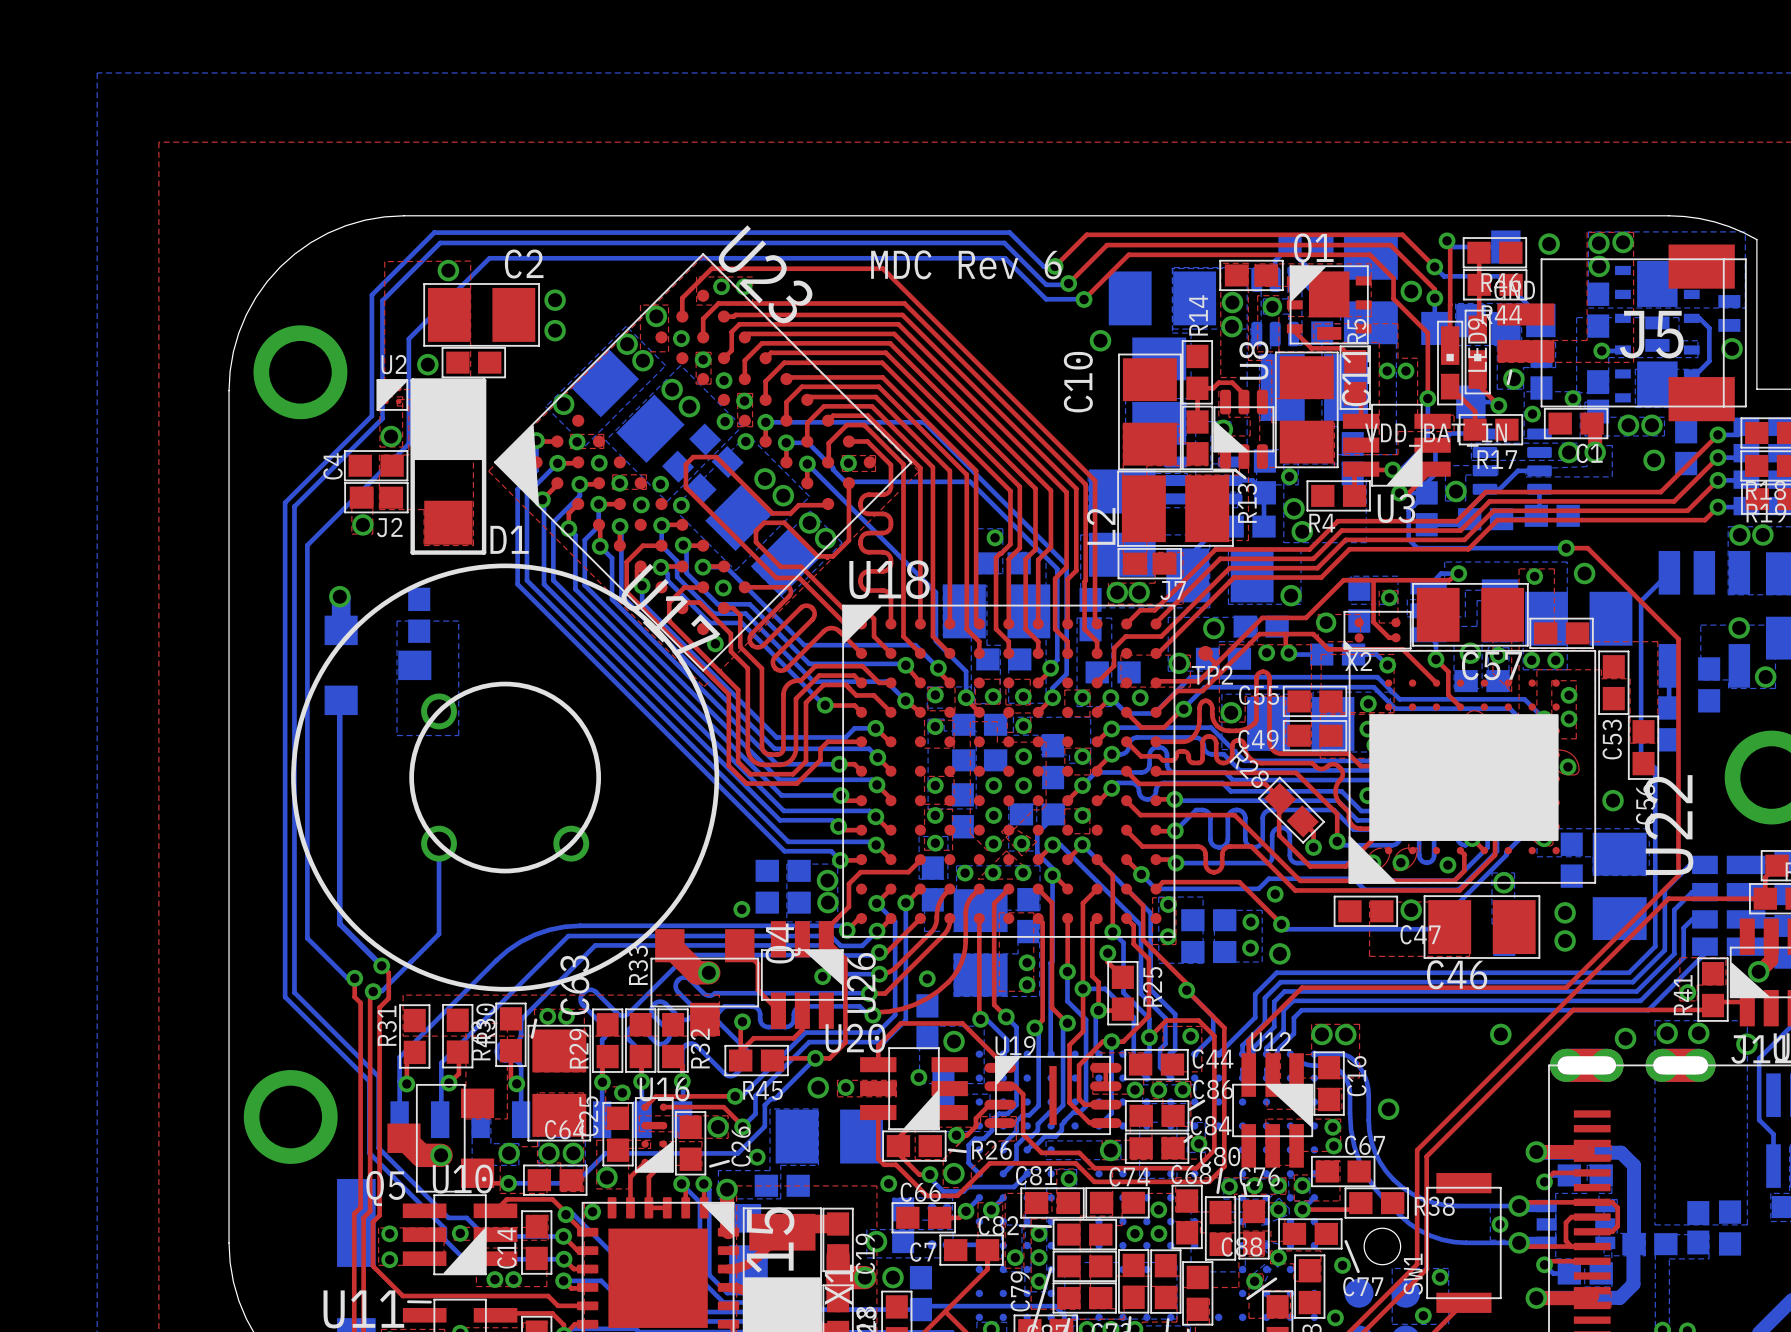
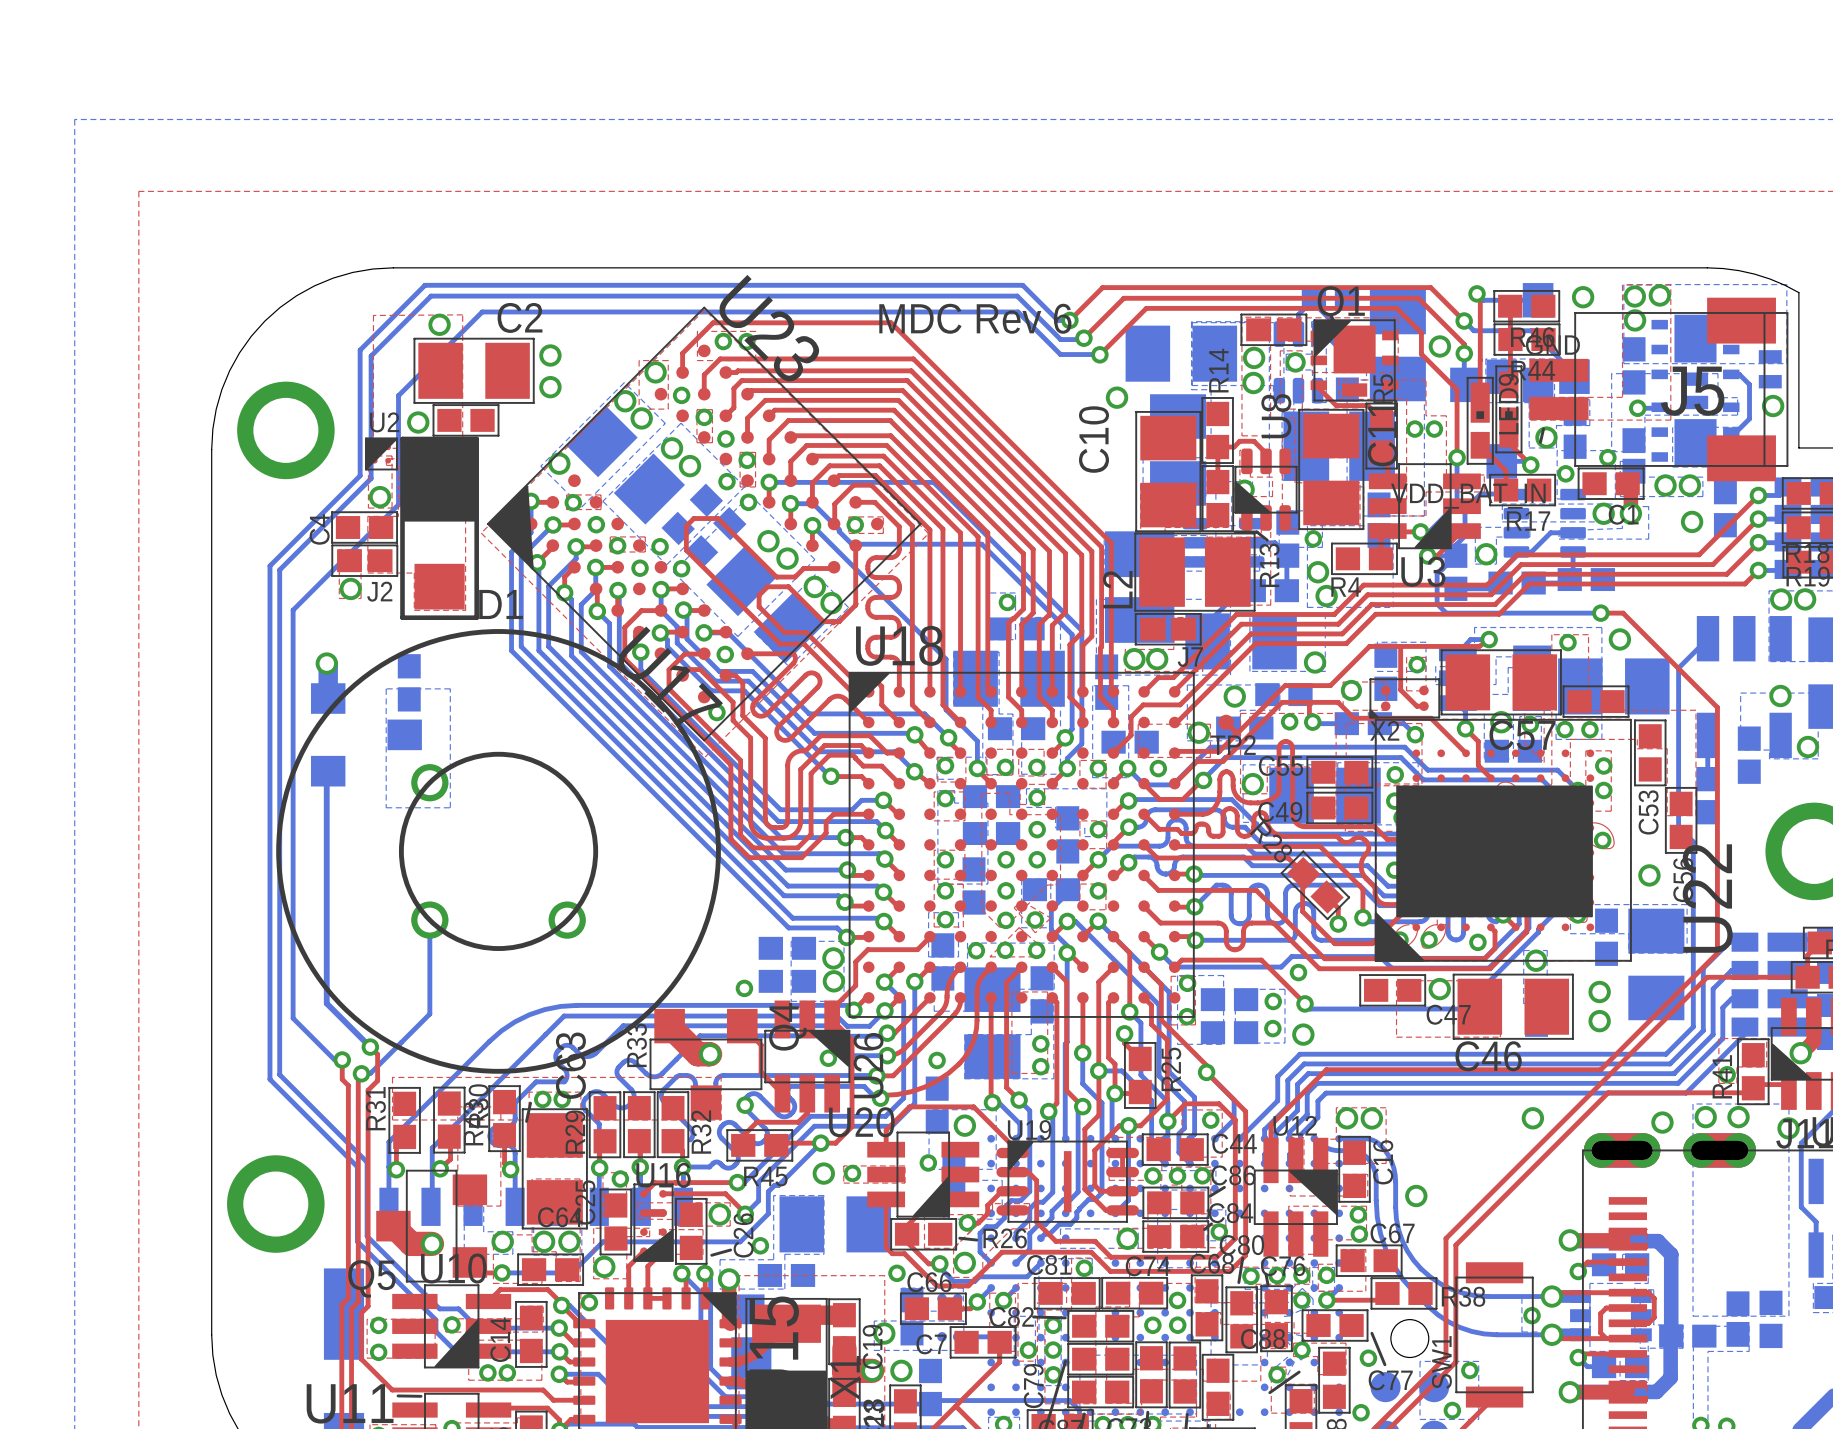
bottom track: (625, 945) (595, 945) (541, 999) -> (623, 1025) (592, 1055) (583, 1056) (570, 1045) (562, 1046) (556, 1052) (555, 1057) (566, 1071) (565, 1080) (536, 1081)
bottom track: (699, 955) (687, 955) (625, 1015) (617, 1014) (594, 990) (585, 991) (581, 996) (581, 1002) (605, 1028) (606, 1034) (602, 1039) -> (699, 1035) (658, 1075) (648, 1075) (632, 1060) (624, 1061) (617, 1068) (617, 1074) (632, 1091) (633, 1100) (627, 1106) (620, 1107) (614, 1105) (600, 1092) (590, 1093) (584, 1100) (583, 1106) (599, 1124)
bottom track: (721, 993) (707, 995) (688, 978) (683, 977) (678, 979) (675, 984) (676, 989) (692, 1007) (693, 1012) (691, 1016) (687, 1019) (681, 1019) (665, 1003) (658, 1001) (652, 1006) (651, 1012) (668, 1031) (669, 1036) (666, 1041) (661, 1043) (656, 1042) (638, 1026) (631, 1026) (627, 1031) (628, 1039) (644, 1056) (643, 1065) -> (723, 1075) (716, 1080) (715, 1103) (709, 1108) (702, 1108) (696, 1104) (695, 1082) (689, 1076) (677, 1076) (662, 1091) (663, 1100) (691, 1129) (692, 1135) (690, 1140)
bottom track: (859, 1006) (799, 1006) (794, 1011) (792, 1023) (785, 1027) (764, 1025) (760, 1021) (759, 1010) (754, 1006) (724, 1006) (717, 1014) (717, 1020) (748, 1051) (748, 1060) (735, 1074) (728, 1075) (695, 1045) (688, 1043) (682, 1048) (682, 1081) -> (866, 1089) (864, 1086) (790, 1086) (787, 1094) (793, 1102) (794, 1107) (789, 1114) (784, 1116) (778, 1114) (758, 1095) (750, 1094) (744, 1099) (744, 1105) (766, 1130) (767, 1135) (765, 1139) (759, 1143) (754, 1143) (734, 1124) (727, 1122) (721, 1127) (719, 1133) (737, 1155) (738, 1160) (734, 1165) (726, 1167) (716, 1161) (709, 1167) (682, 1167)
top track: (742, 1021) (740, 1023) (740, 1051) -> none

